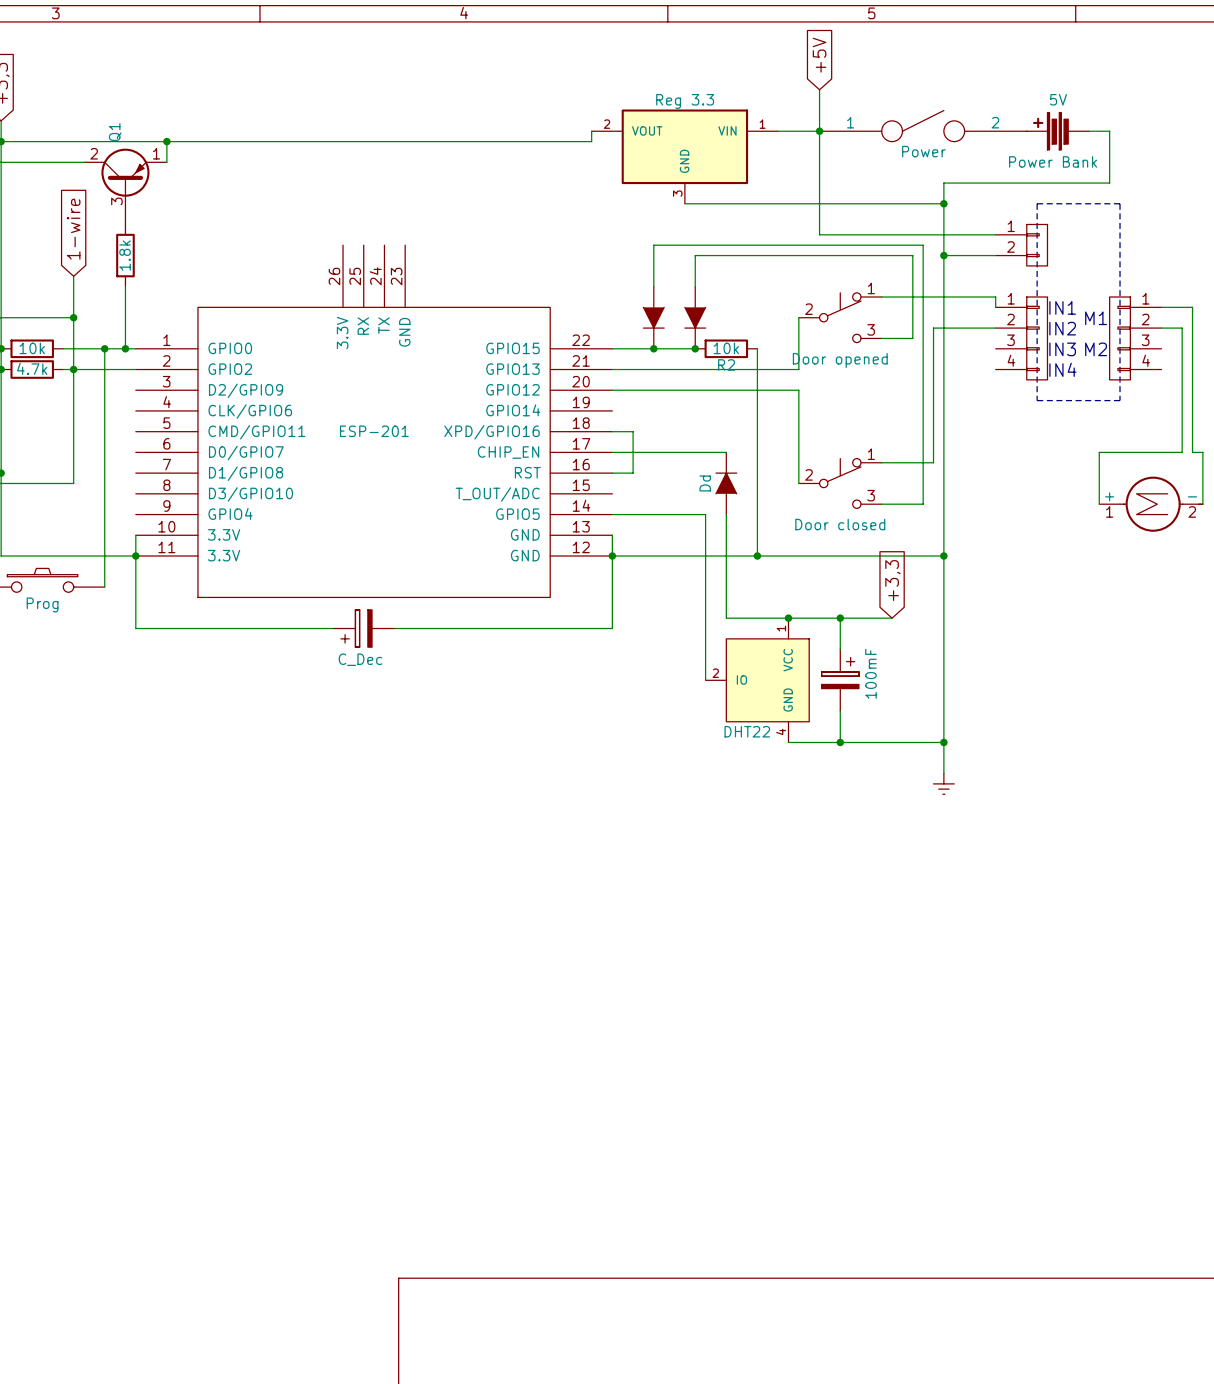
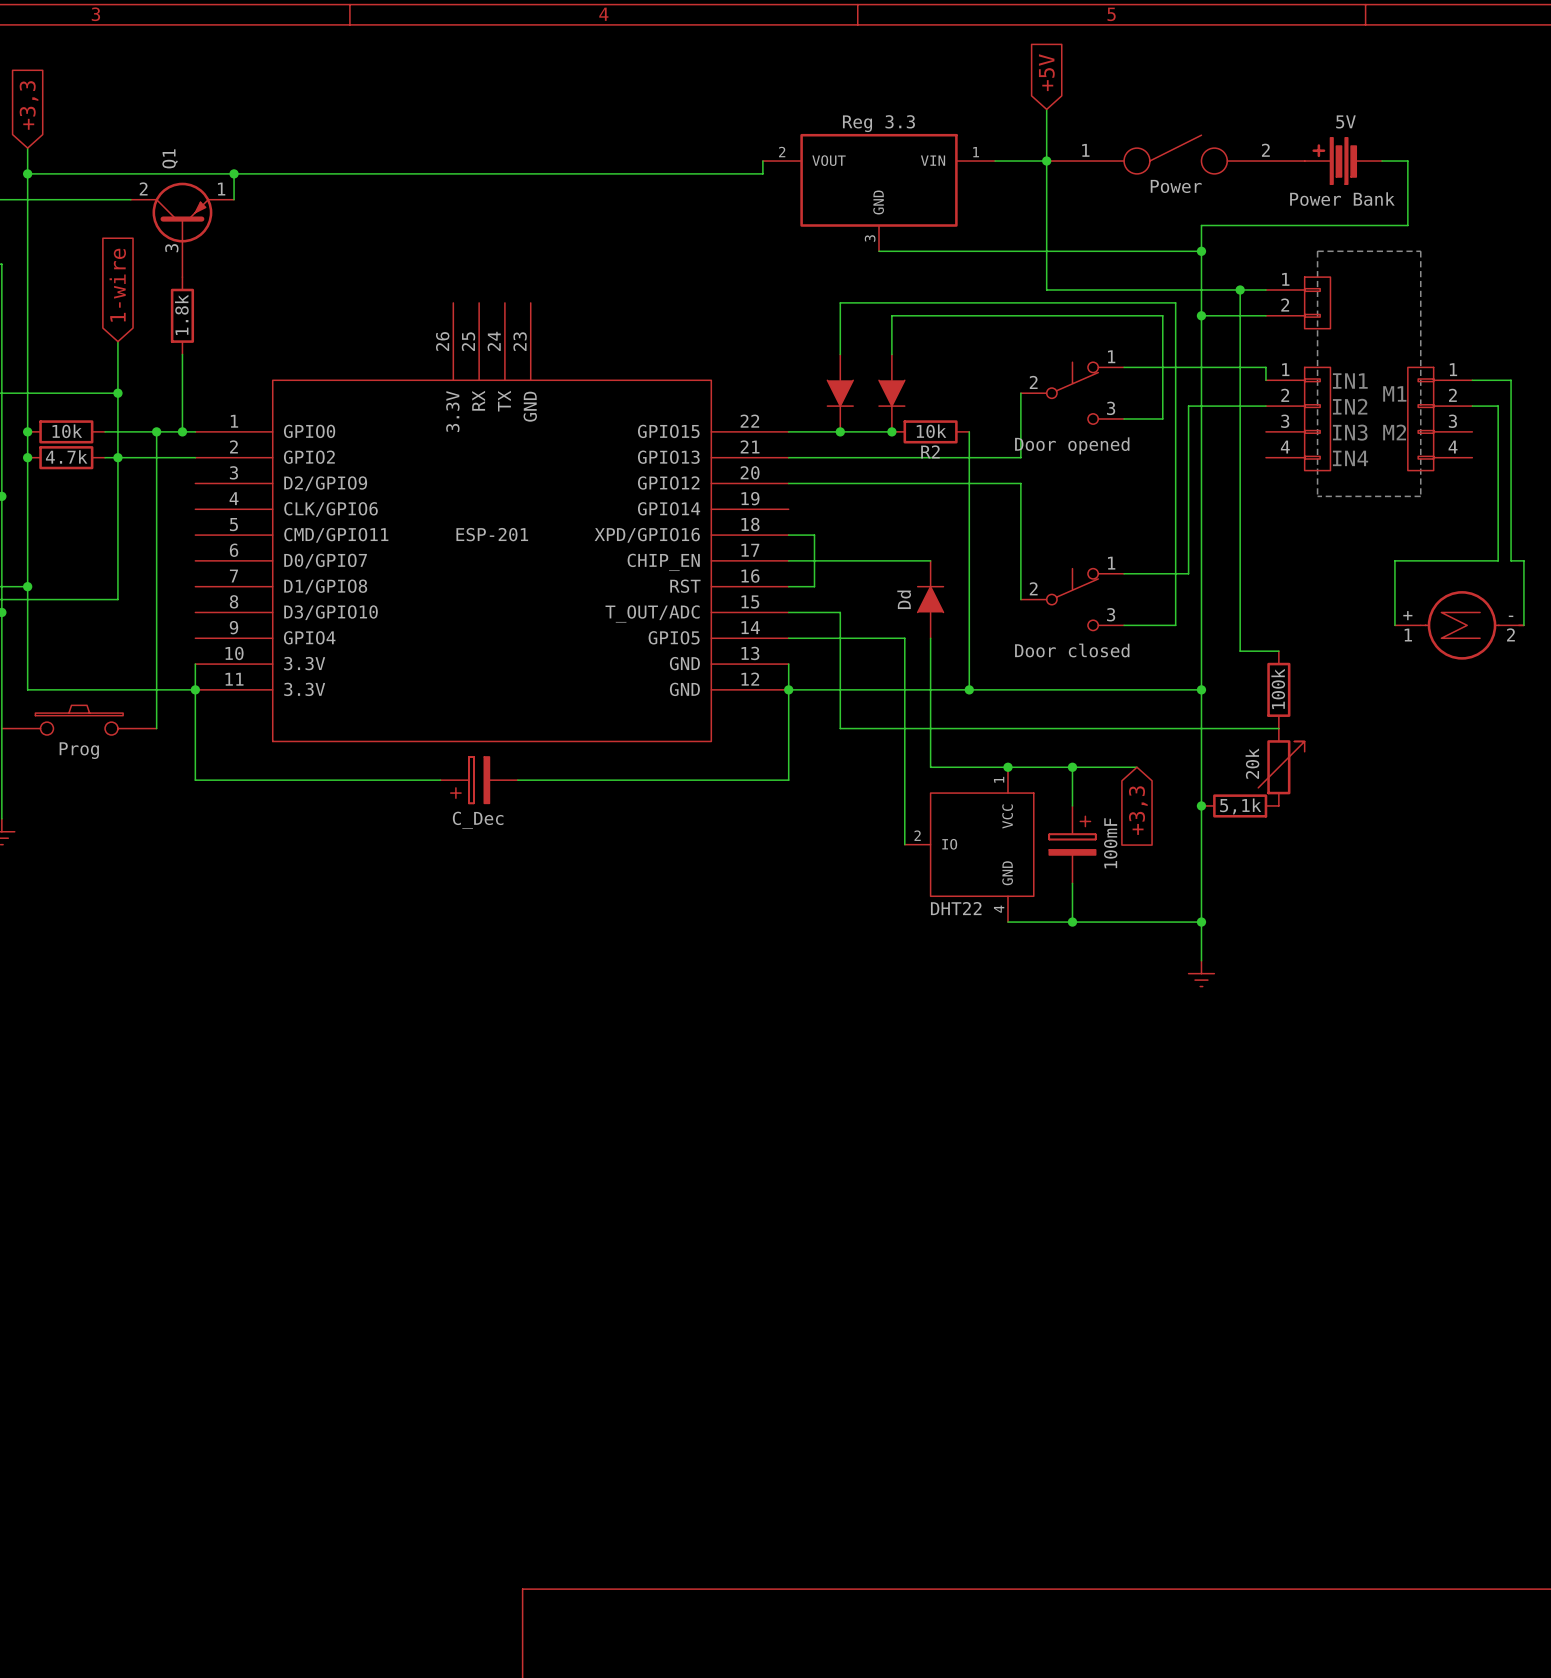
wire: none -> (1240, 290) (1240, 651) (1278, 651)
junction: none -> (1240, 290)
wire: none -> (788, 612) (840, 612) (840, 728) (1278, 728)
part: none -> 100k (1278, 689)
global label rotation: 0° (892, 580) -> 180° (1138, 810)
part: none -> 20k (1281, 767)
junction: none -> (1201, 805)
part: none -> 5,1k (1240, 805)

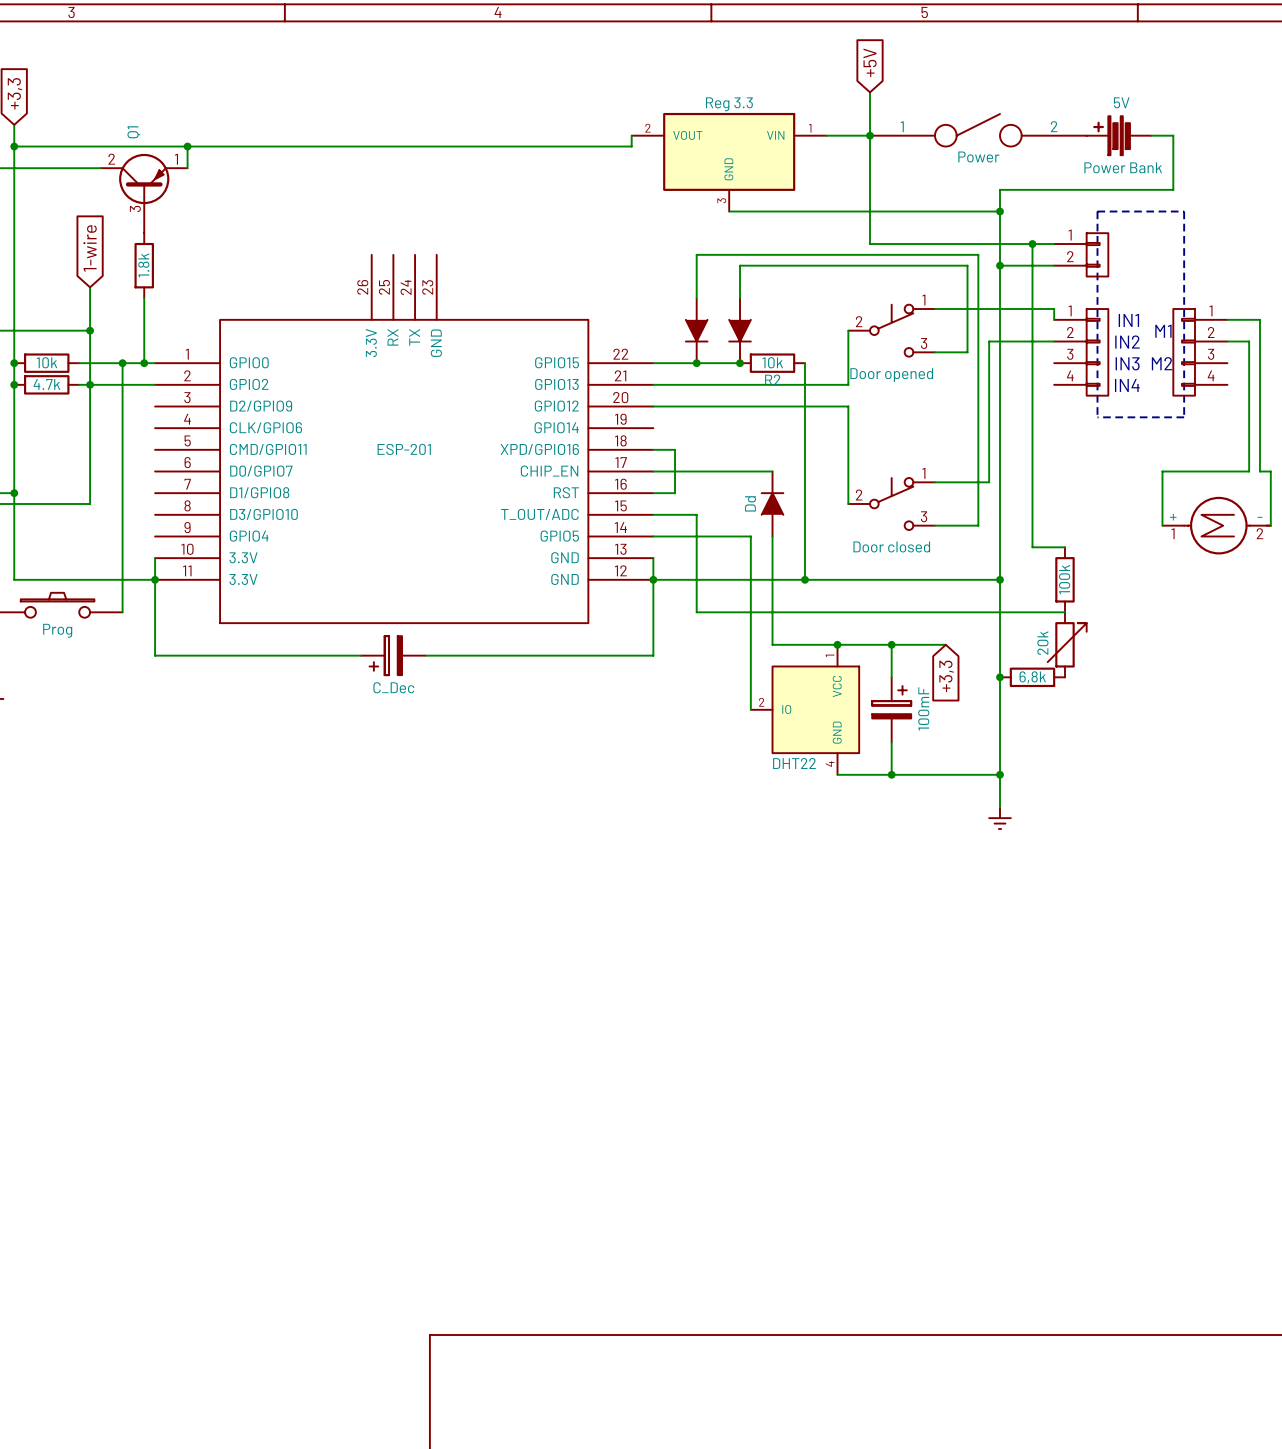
part value: 5,1k (1240, 806) -> 6,8k (1032, 677)

